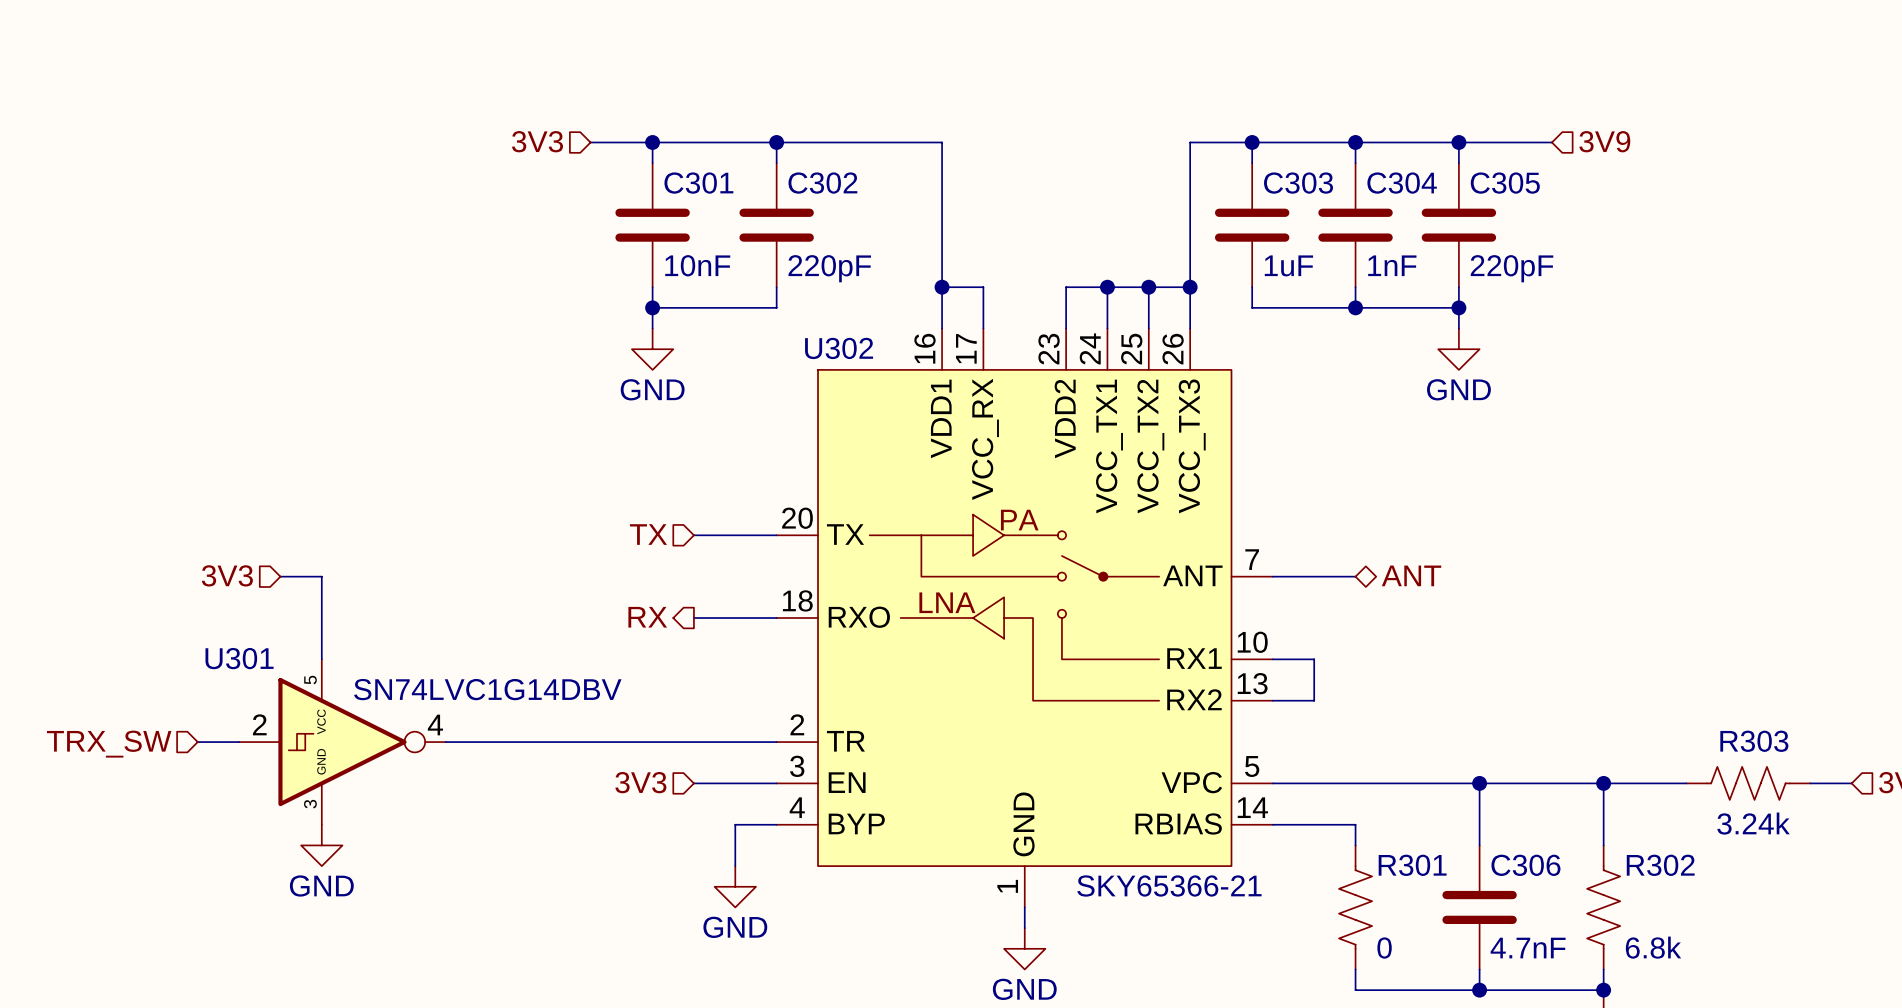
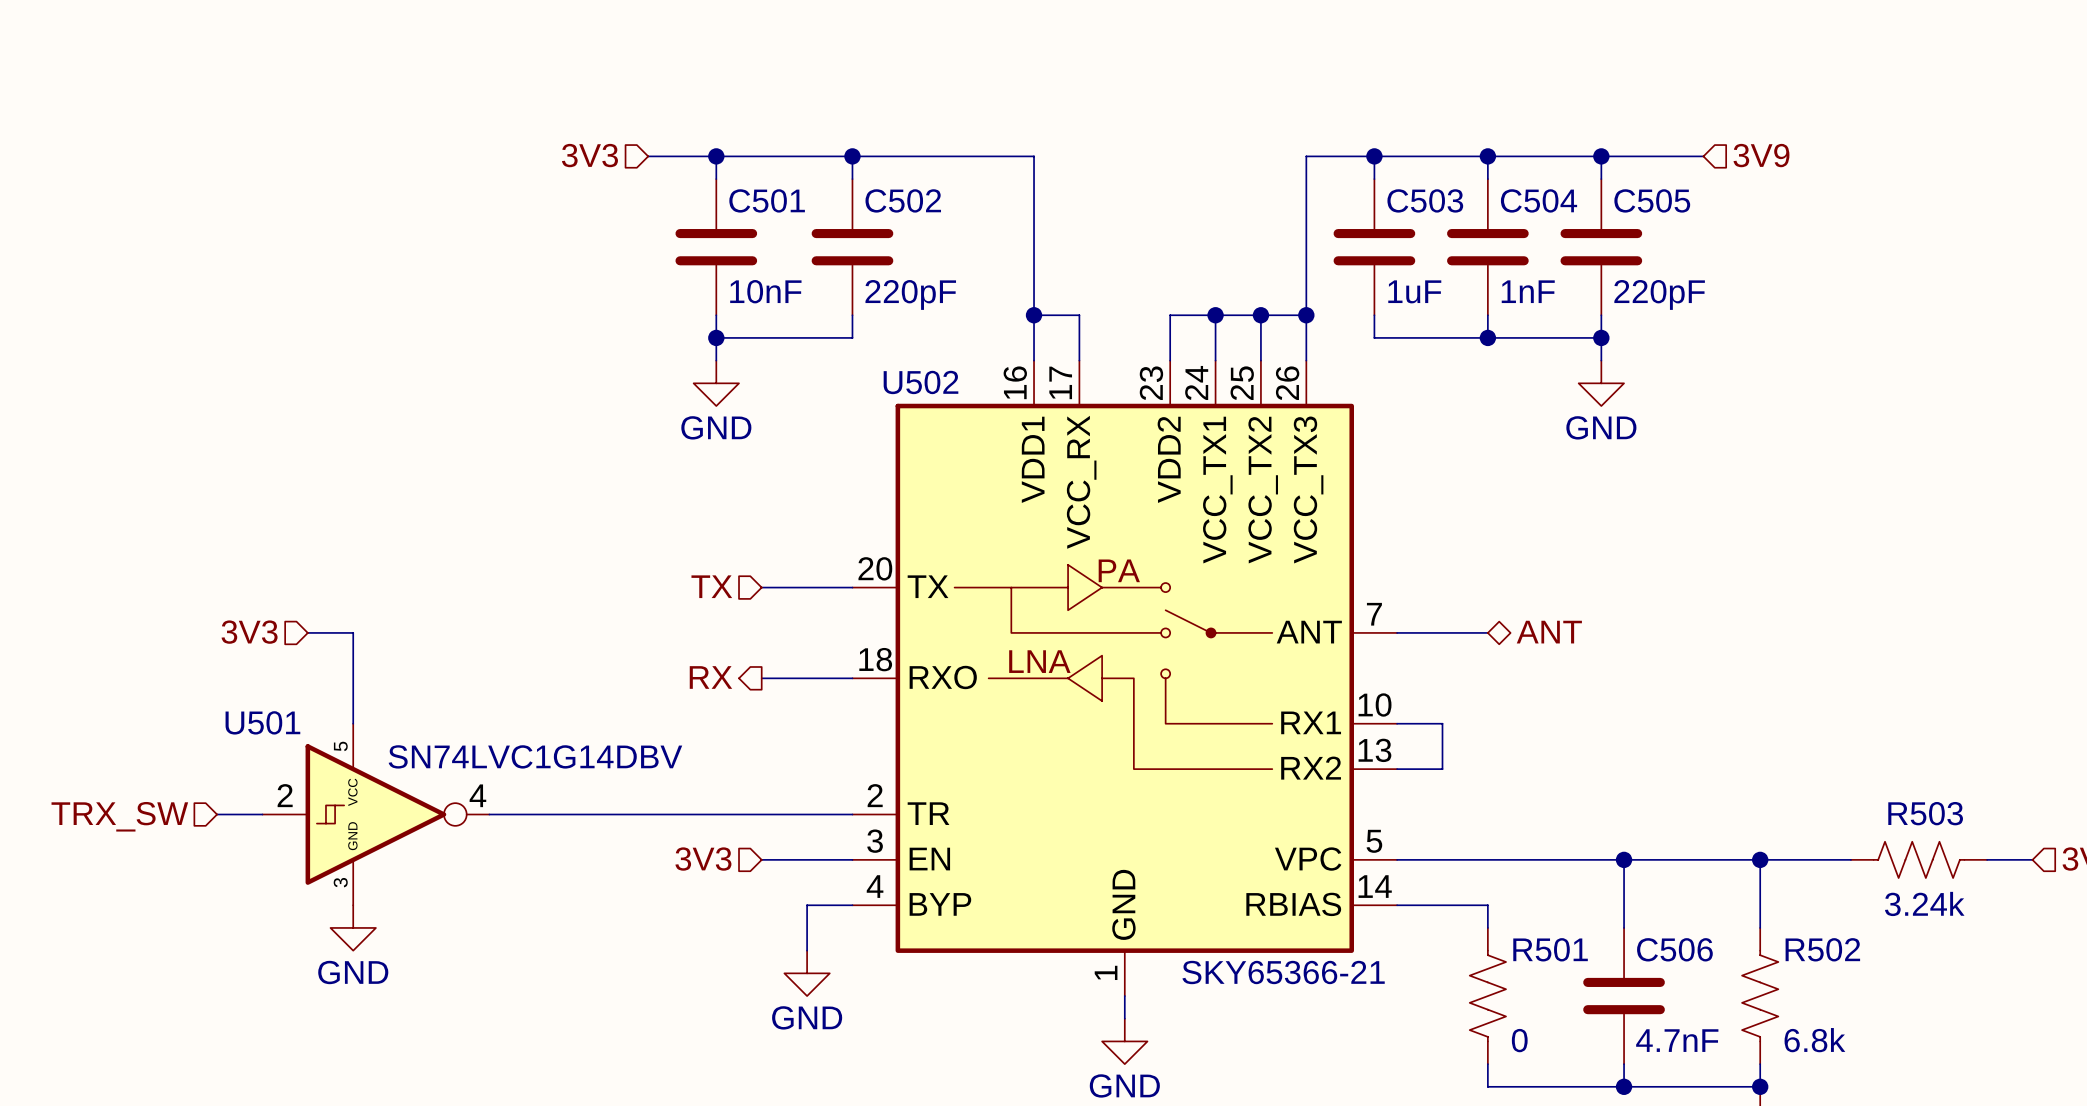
C301 name: C301 (698, 183) -> C501 (767, 200)
C302 name: C302 (822, 183) -> C502 (903, 200)
C303 name: C303 (1298, 183) -> C503 (1425, 200)
C304 name: C304 (1402, 183) -> C504 (1539, 200)
C305 name: C305 (1505, 183) -> C505 (1652, 200)
U302: SKY65366-21 (1024, 618) -> none
U502: none -> SKY65366-21 (1124, 678)
U301 name: U301 (239, 658) -> U501 (262, 722)
R303 name: R303 (1754, 741) -> R503 (1925, 813)
R301 name: R301 (1412, 865) -> R501 (1550, 949)
C306 name: C306 (1525, 865) -> C506 (1674, 949)
R302 name: R302 (1660, 865) -> R502 (1822, 949)

